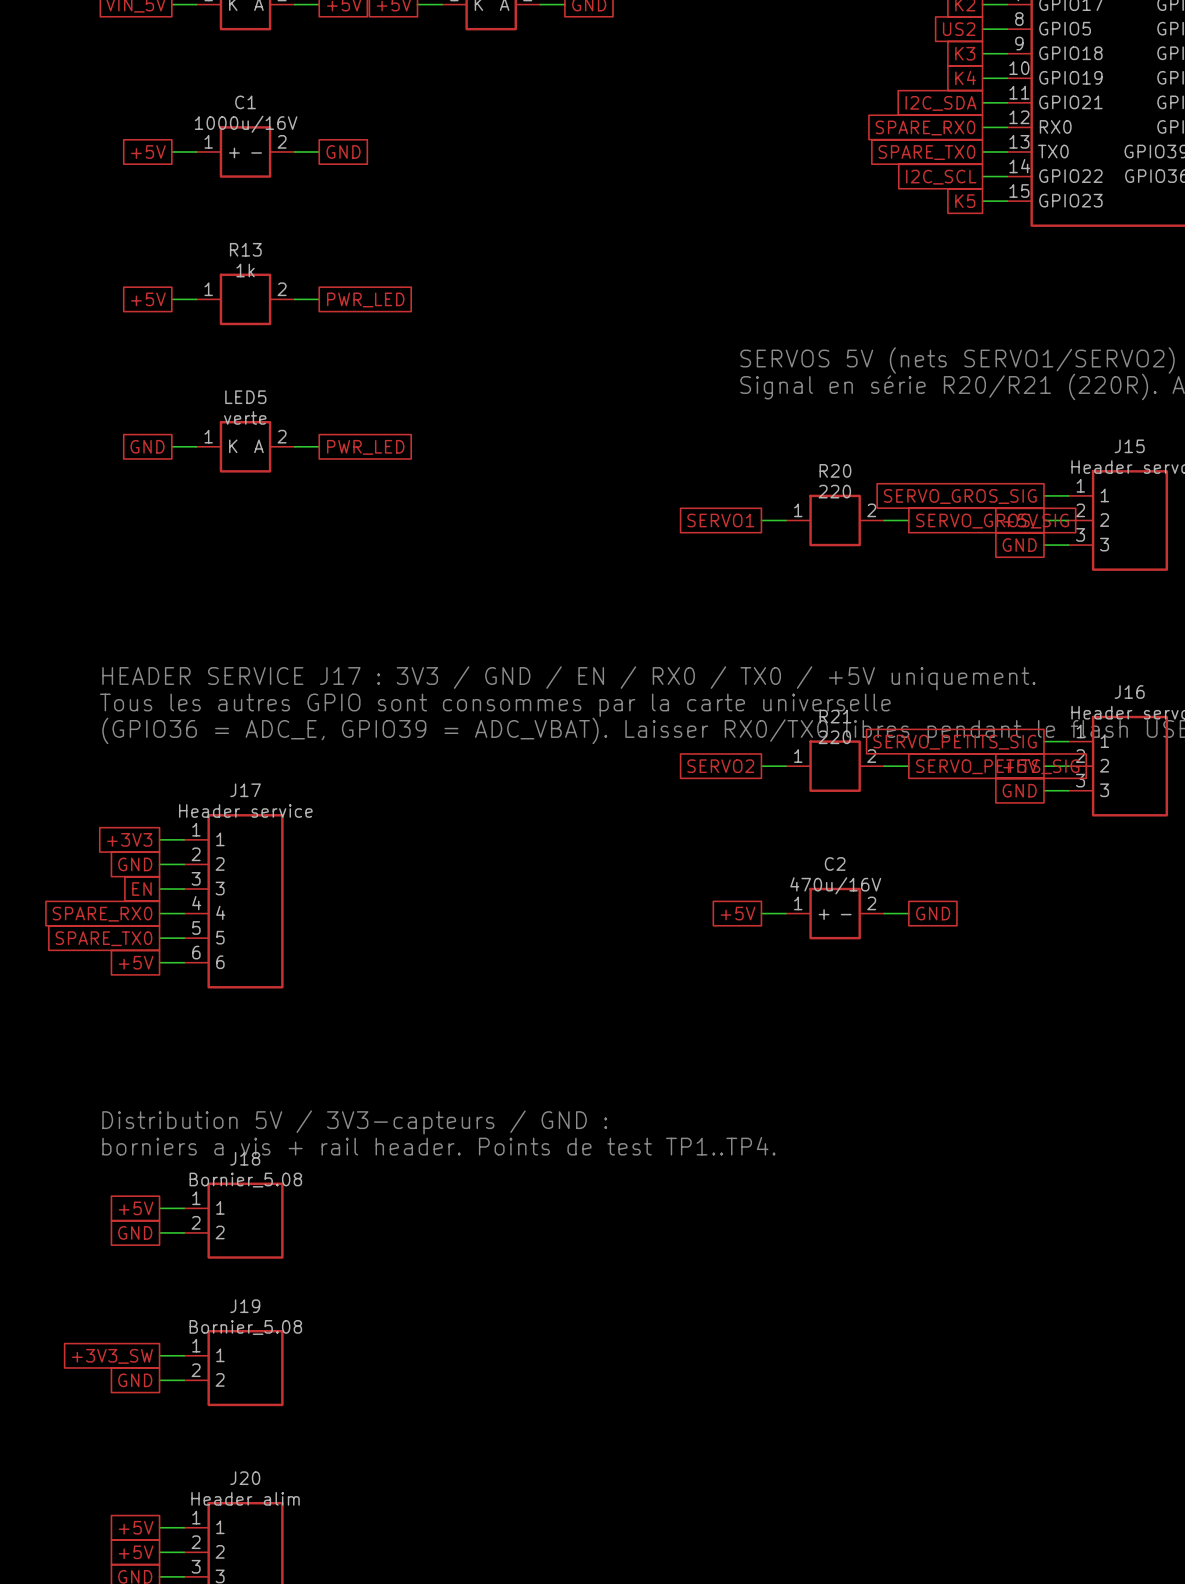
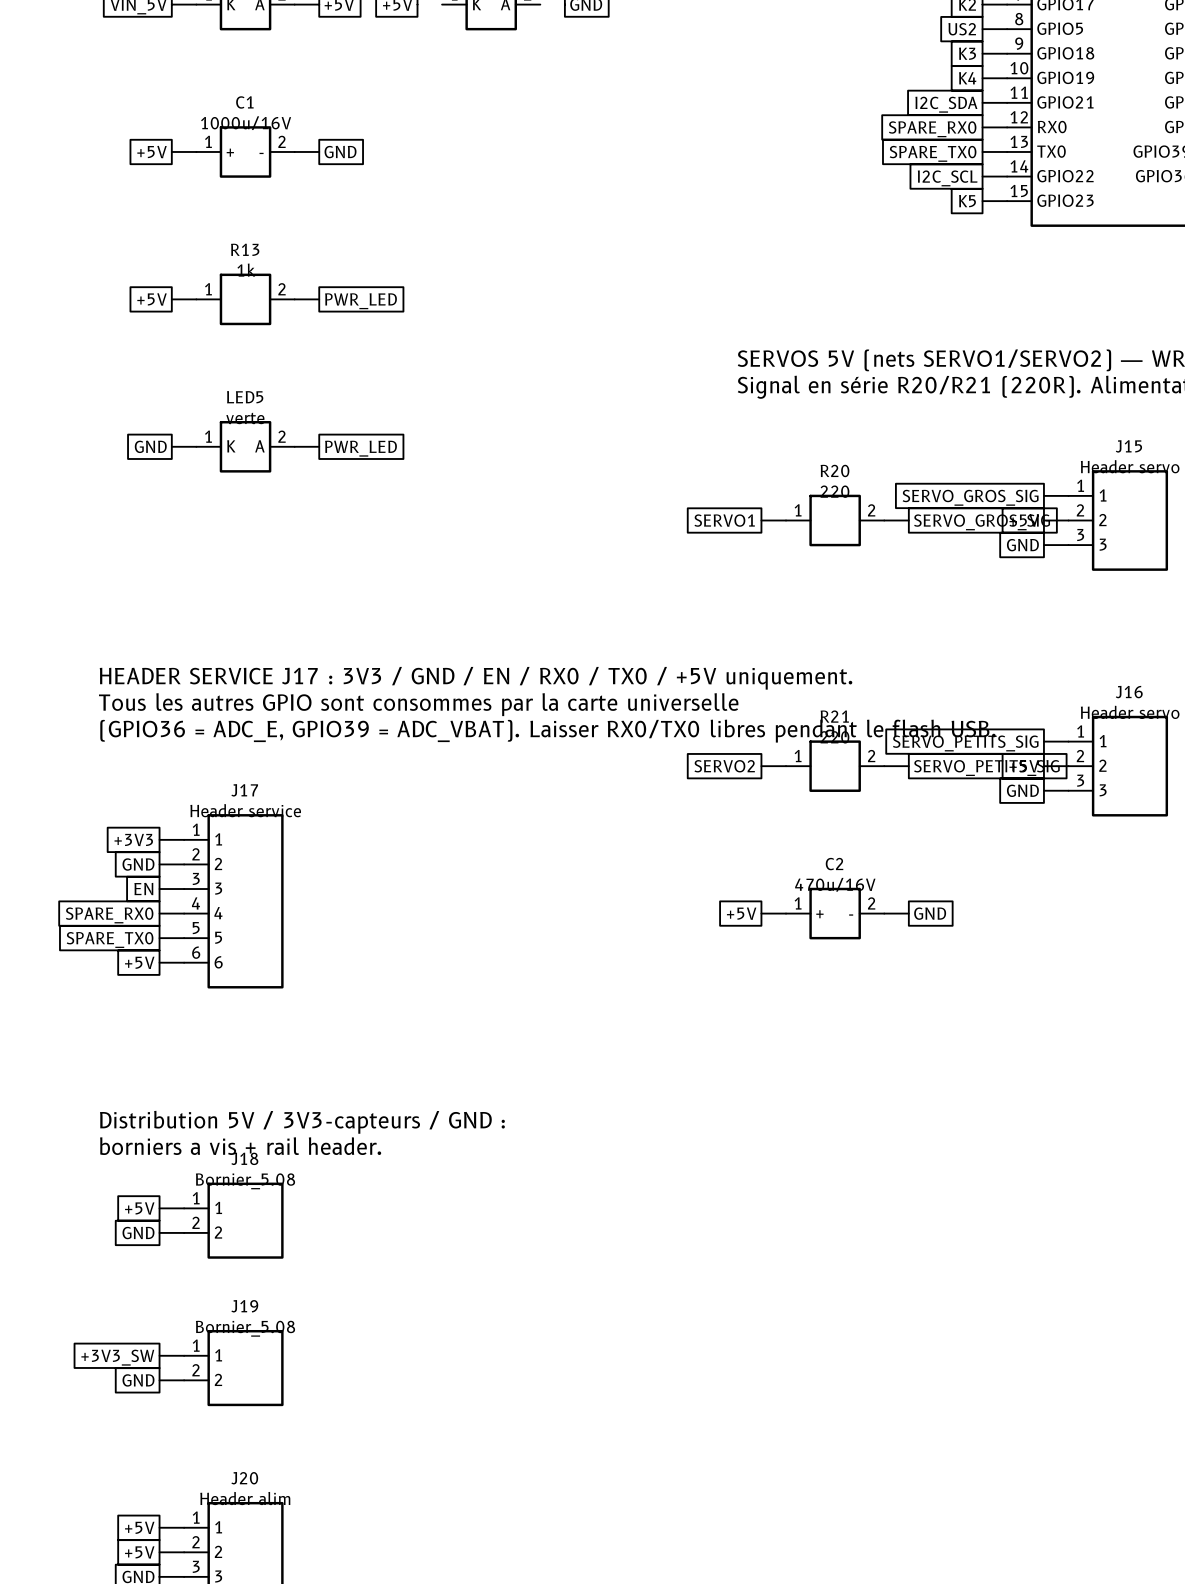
wire: (417, 4) (442, 4) -> none
wire: (540, 4) (564, 4) -> none
text: borniers a vis + rail header. Points de test TP1..TP4. (438, 1146) -> borniers a vis + rail header. (240, 1146)

